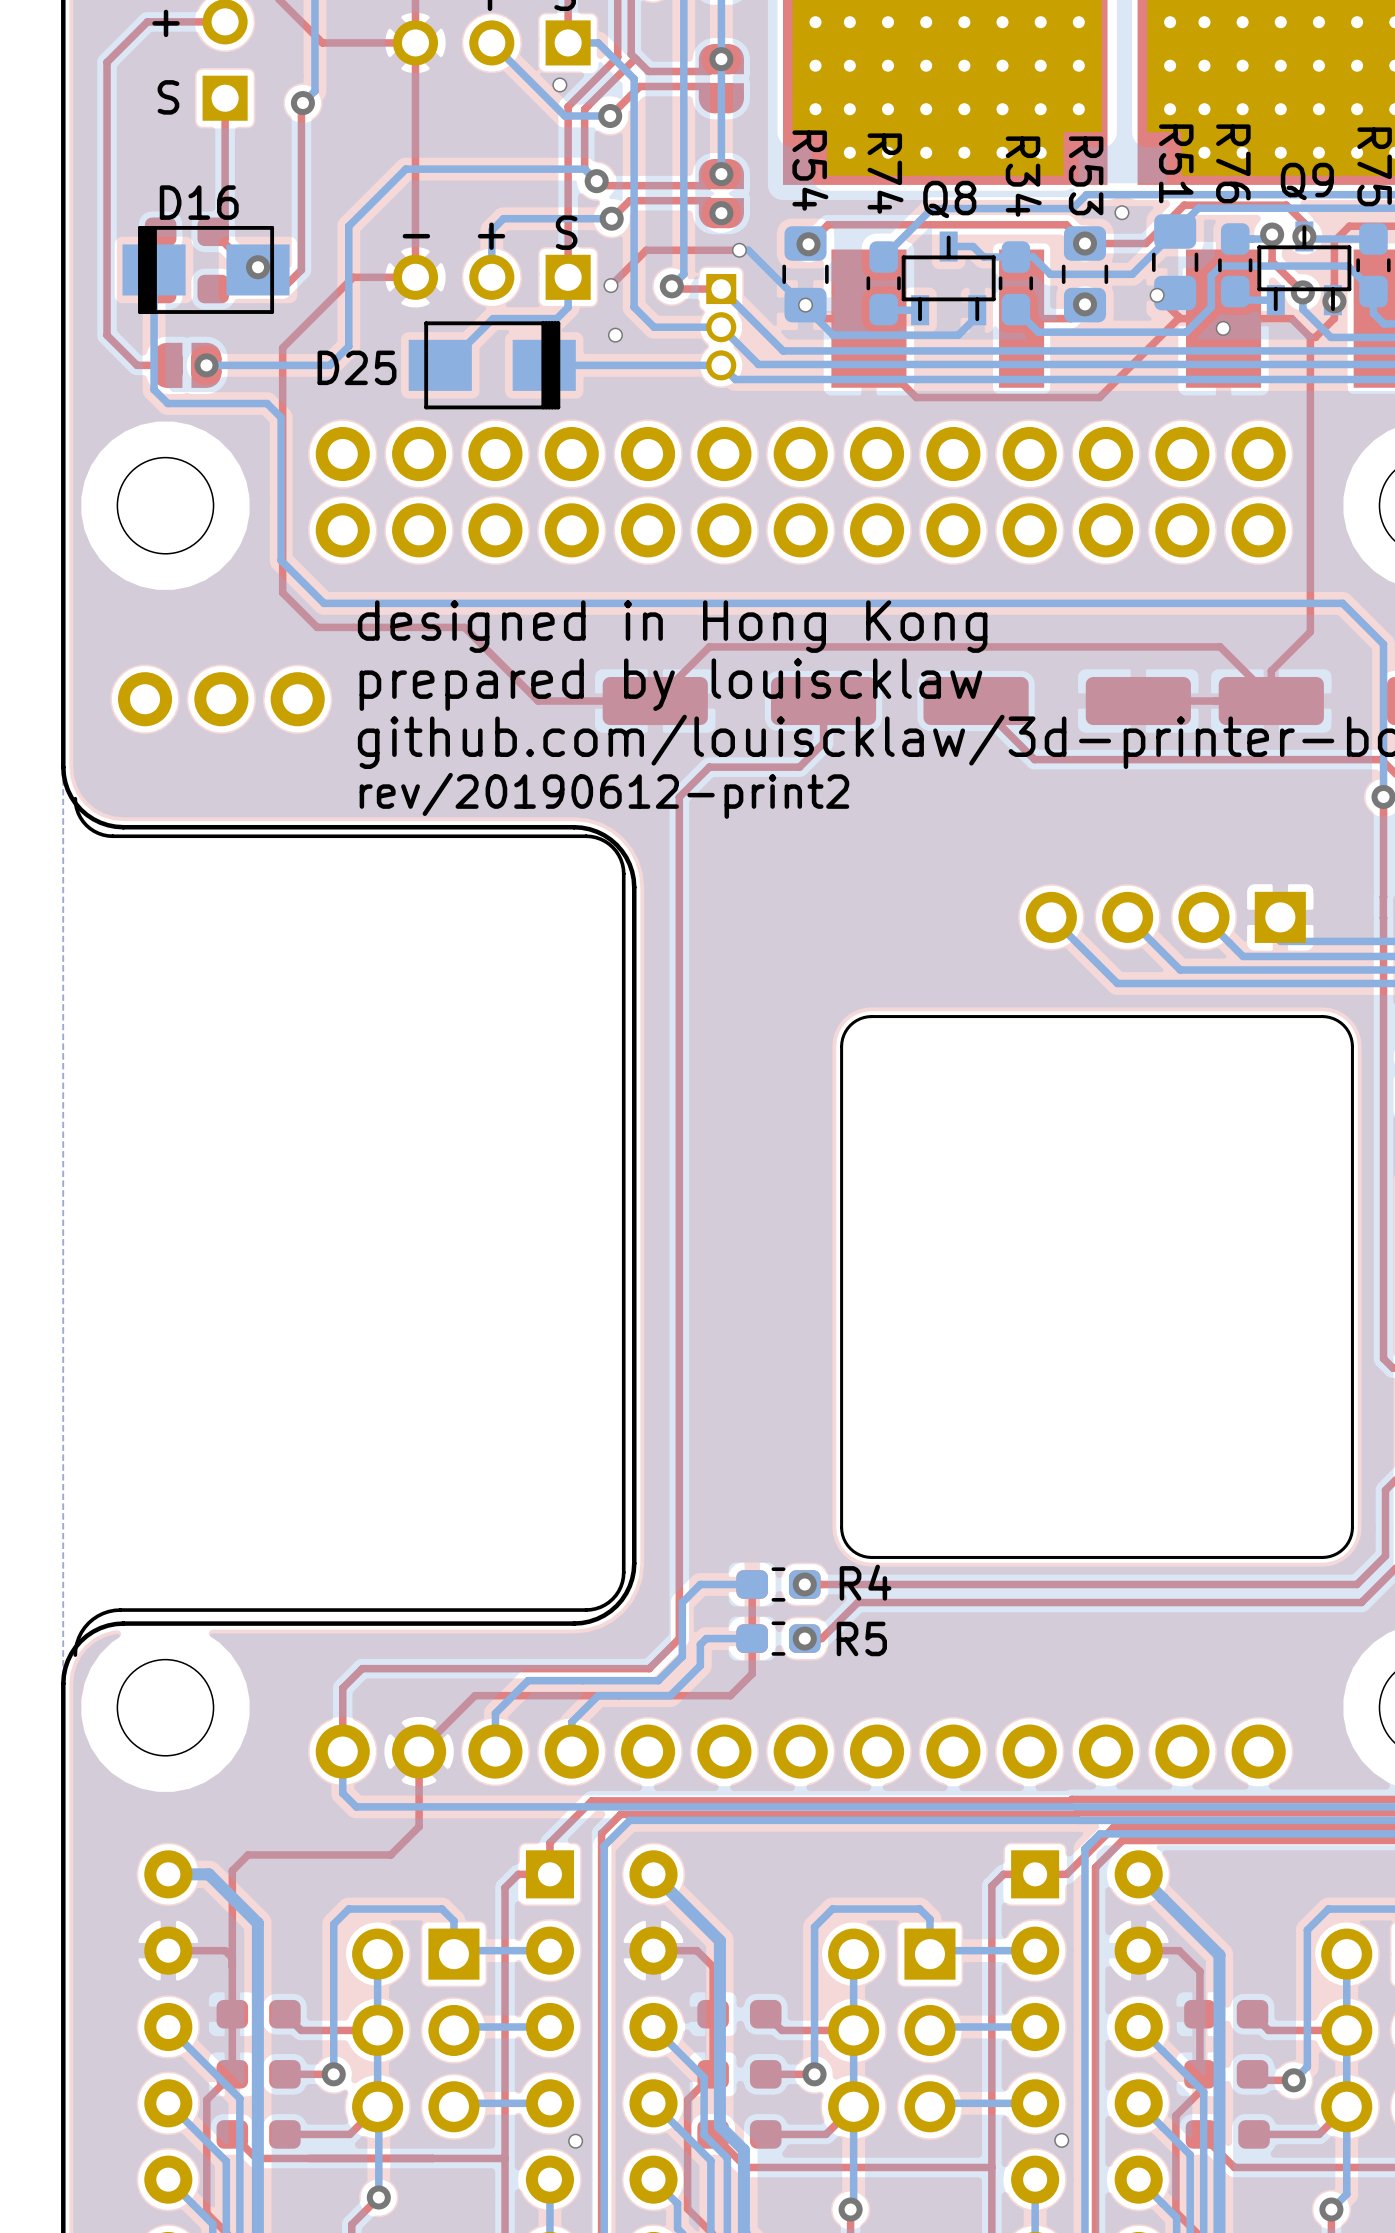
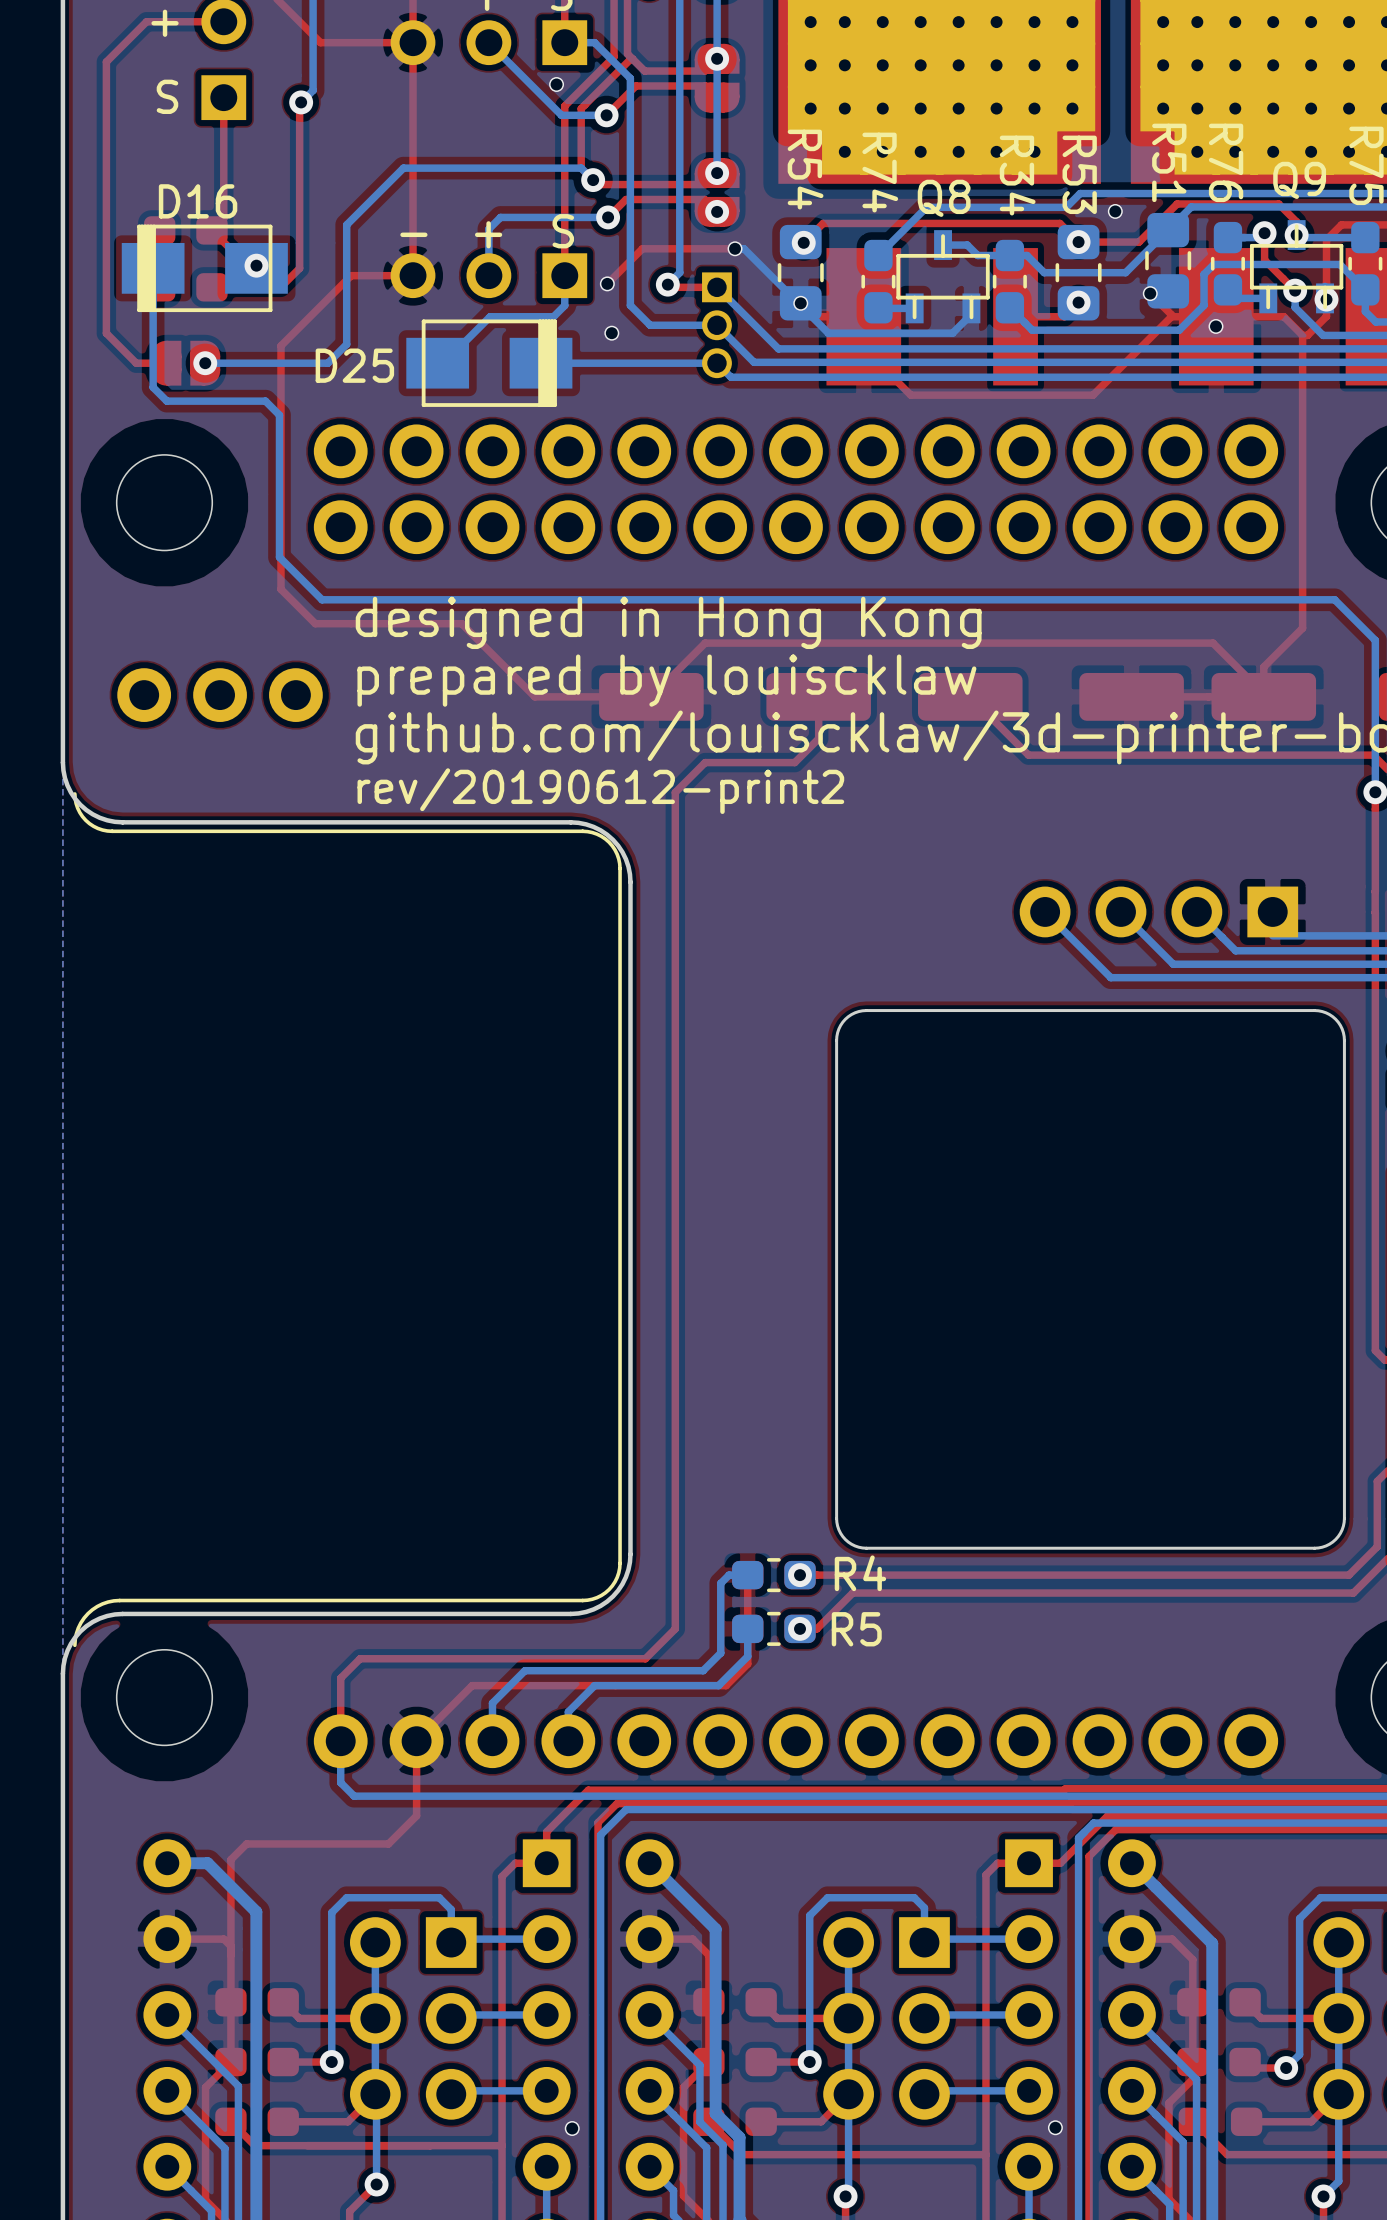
bottom track: (733, 1584) (700, 1584) (682, 1602) (682, 1656) (658, 1680) -> (729, 1575) (720, 1583) (720, 1653) (703, 1670) (654, 1670)
bottom track: (752, 1638) (706, 1638) (700, 1644) (700, 1665) (670, 1695) -> (747, 1628) (747, 1656) (718, 1685) (666, 1685)

